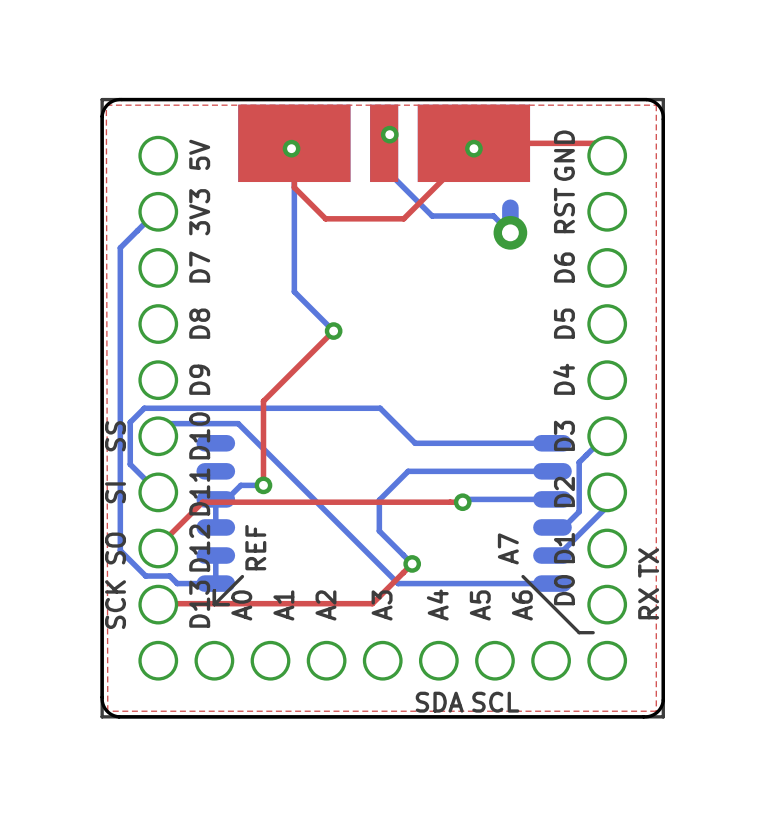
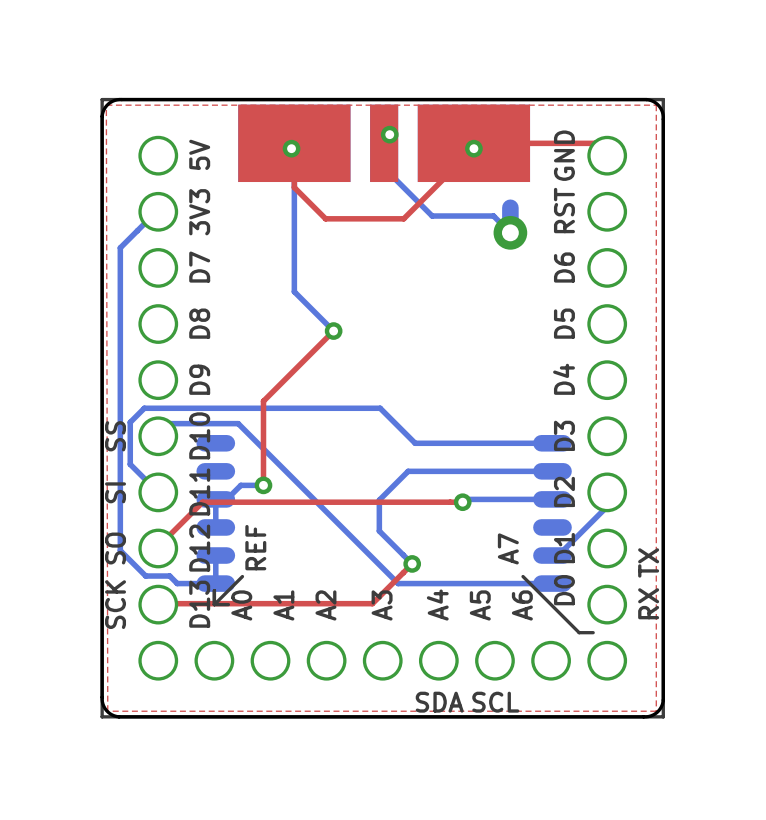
bottom track: (606, 435) (579, 462) (579, 511) (563, 527) -> none

